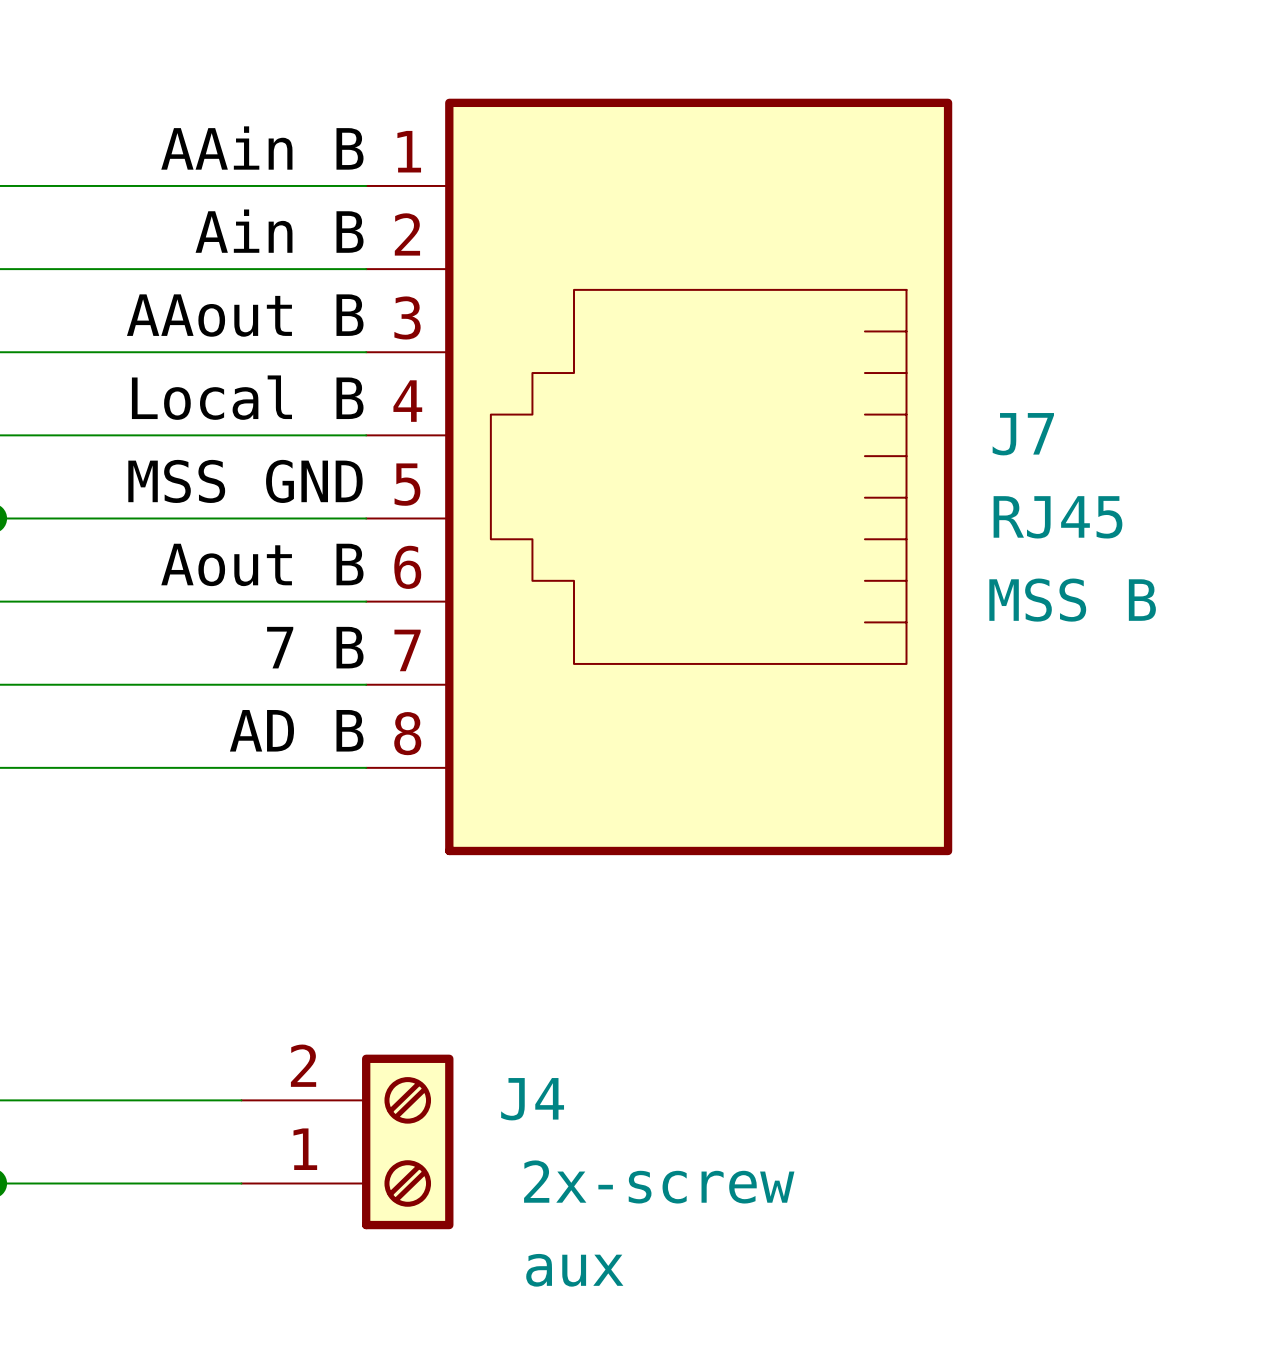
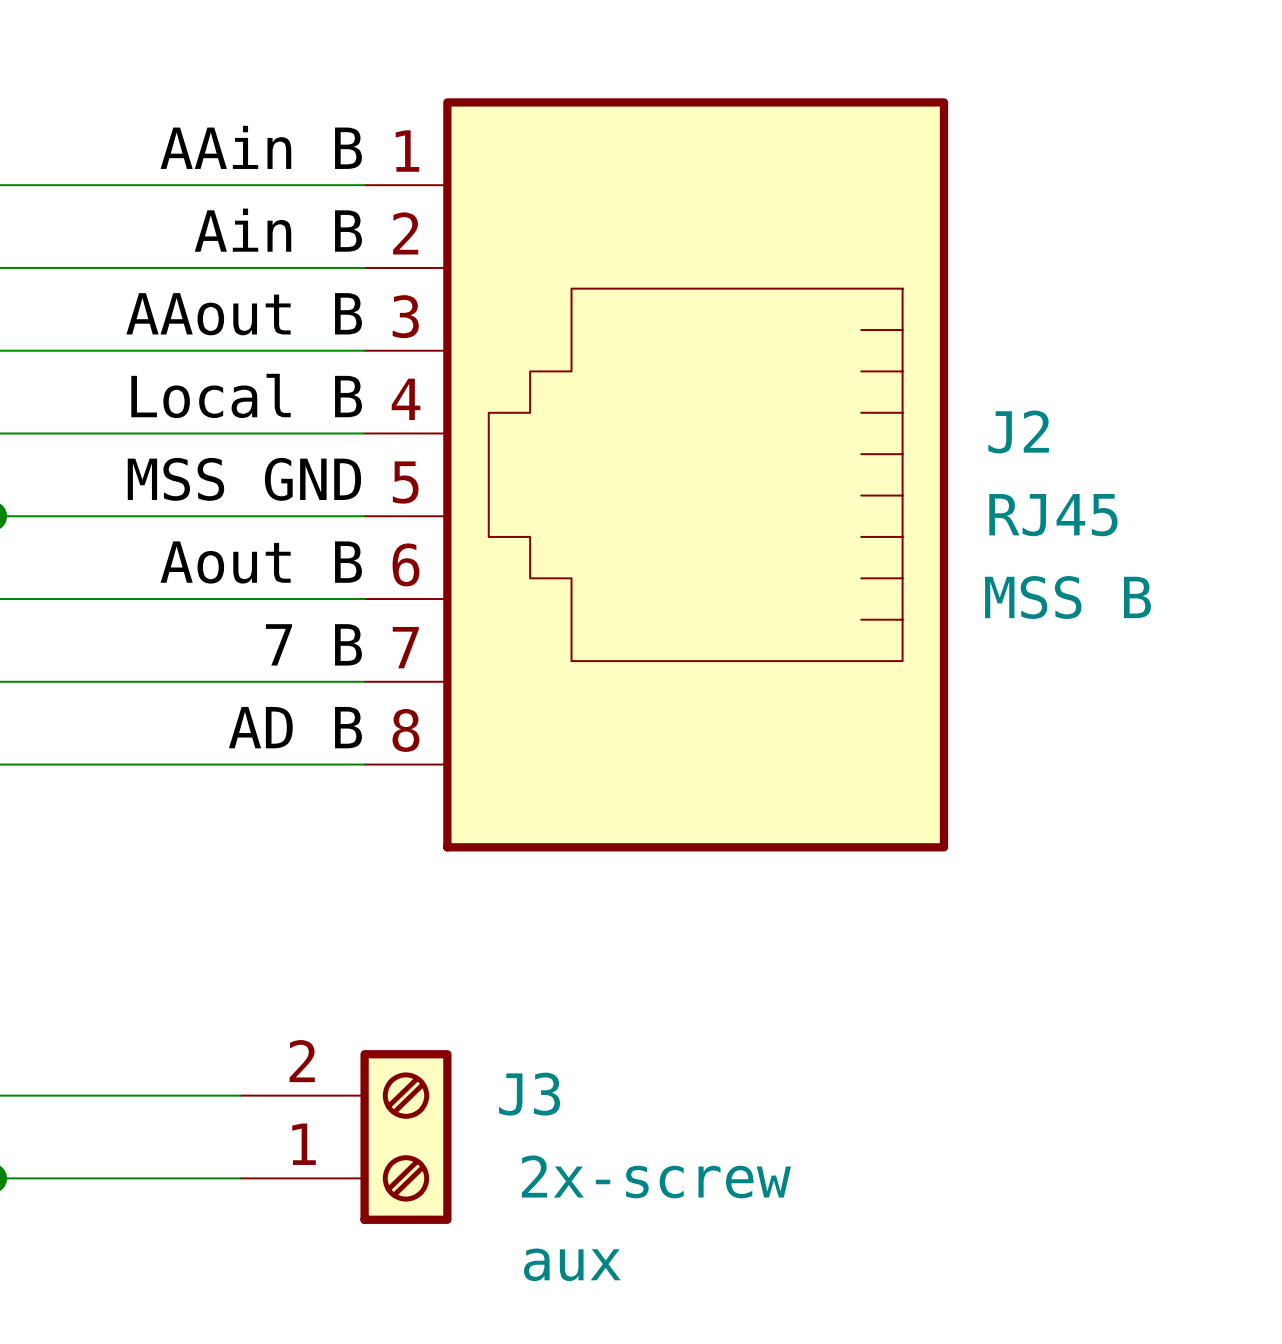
J7 name: J7 (1023, 434) -> J2 (1018, 431)
J4 name: J4 (532, 1099) -> J3 (529, 1094)

